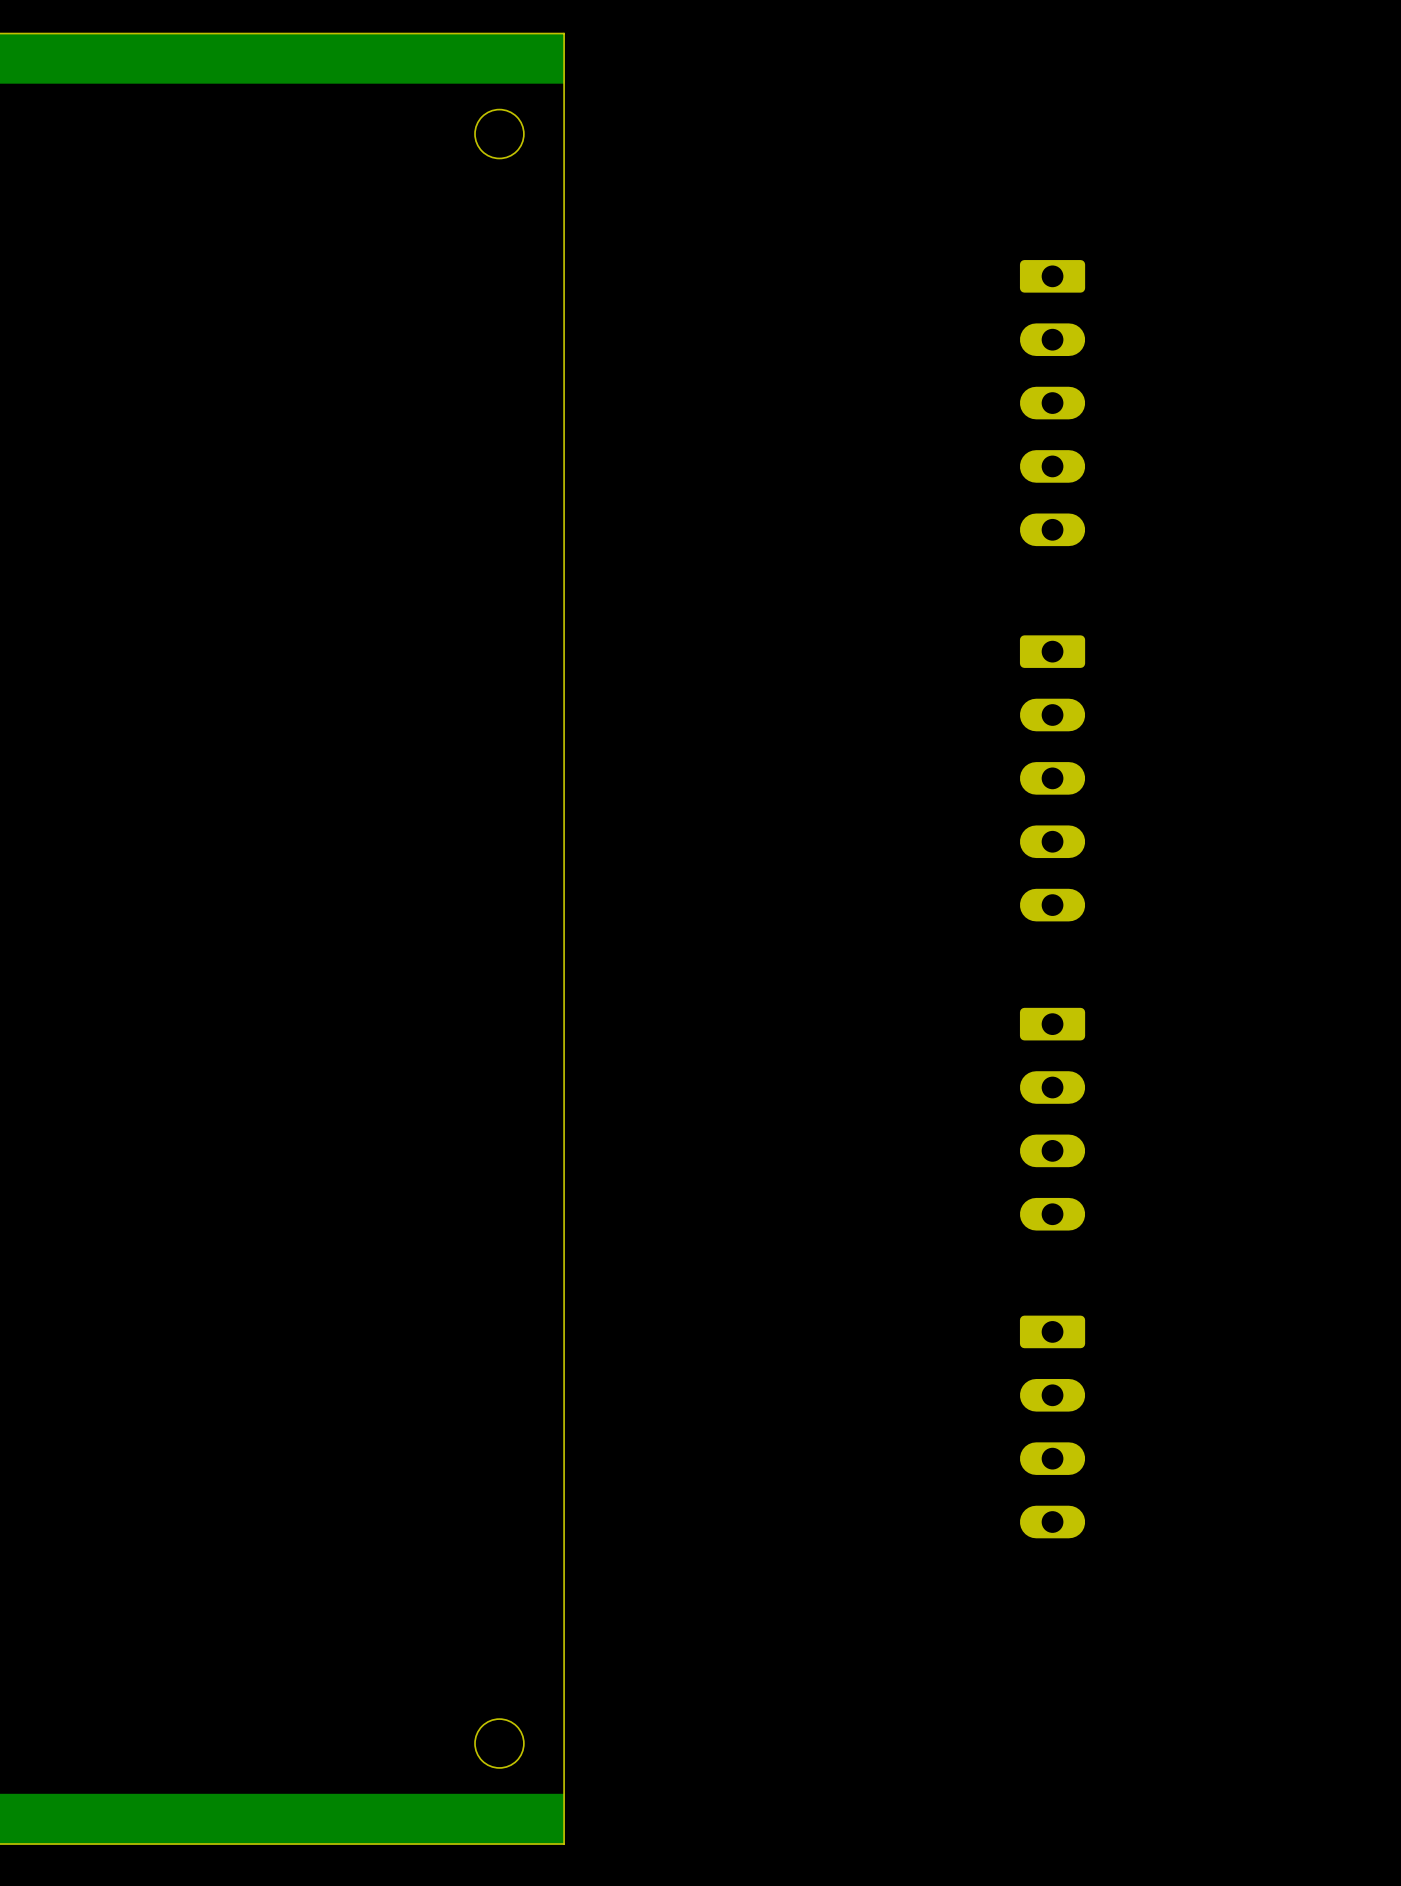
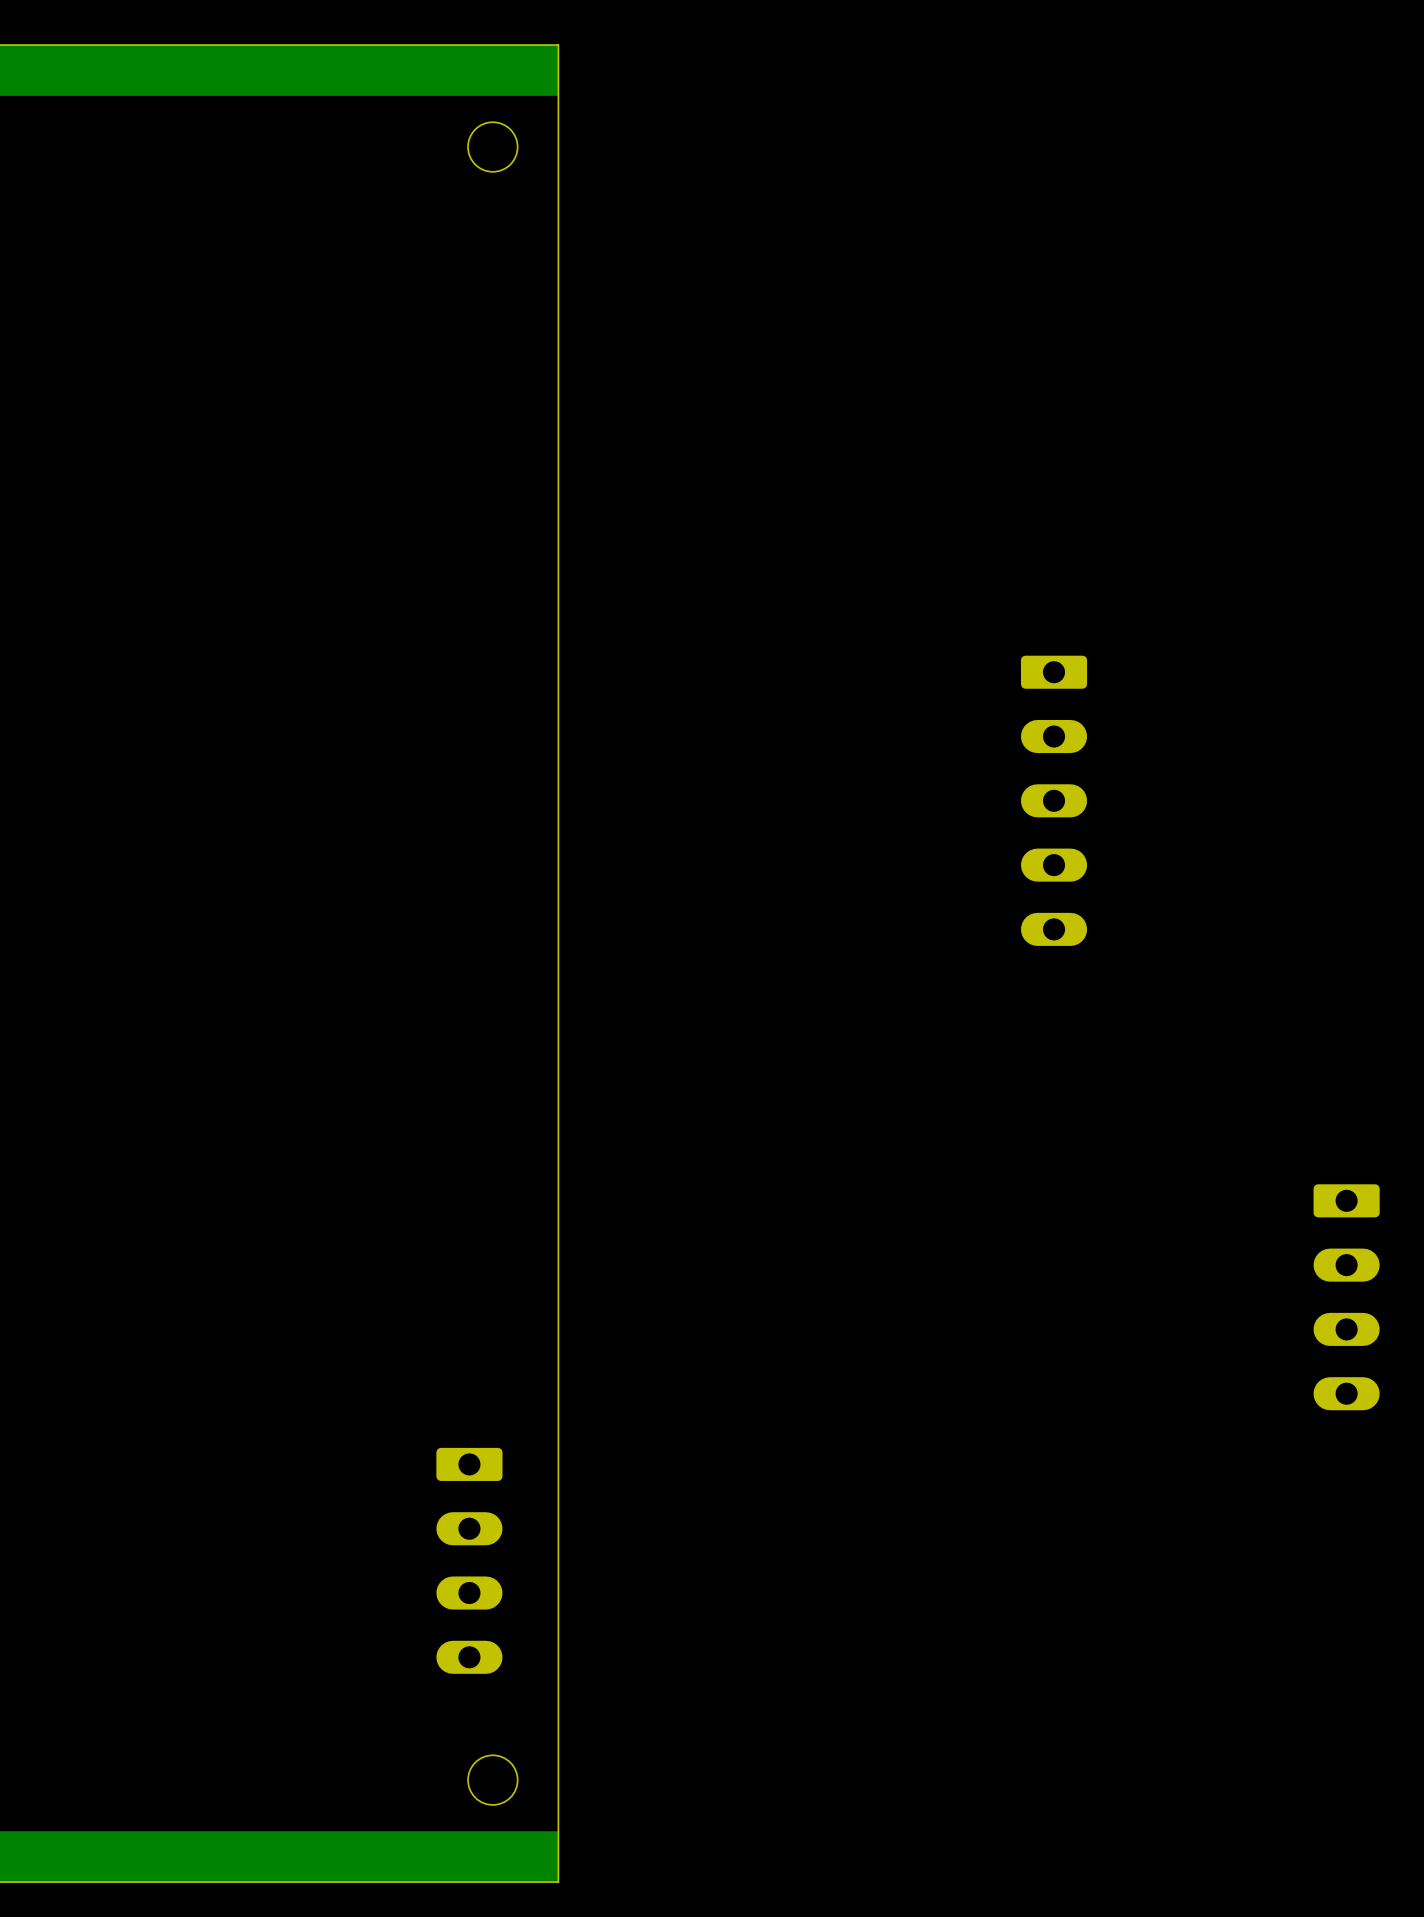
part: (1052, 403) -> none
part: (1052, 1119) -> none
part: none -> (1346, 1297)
part: (1052, 1426) -> none
part: none -> (469, 1560)

